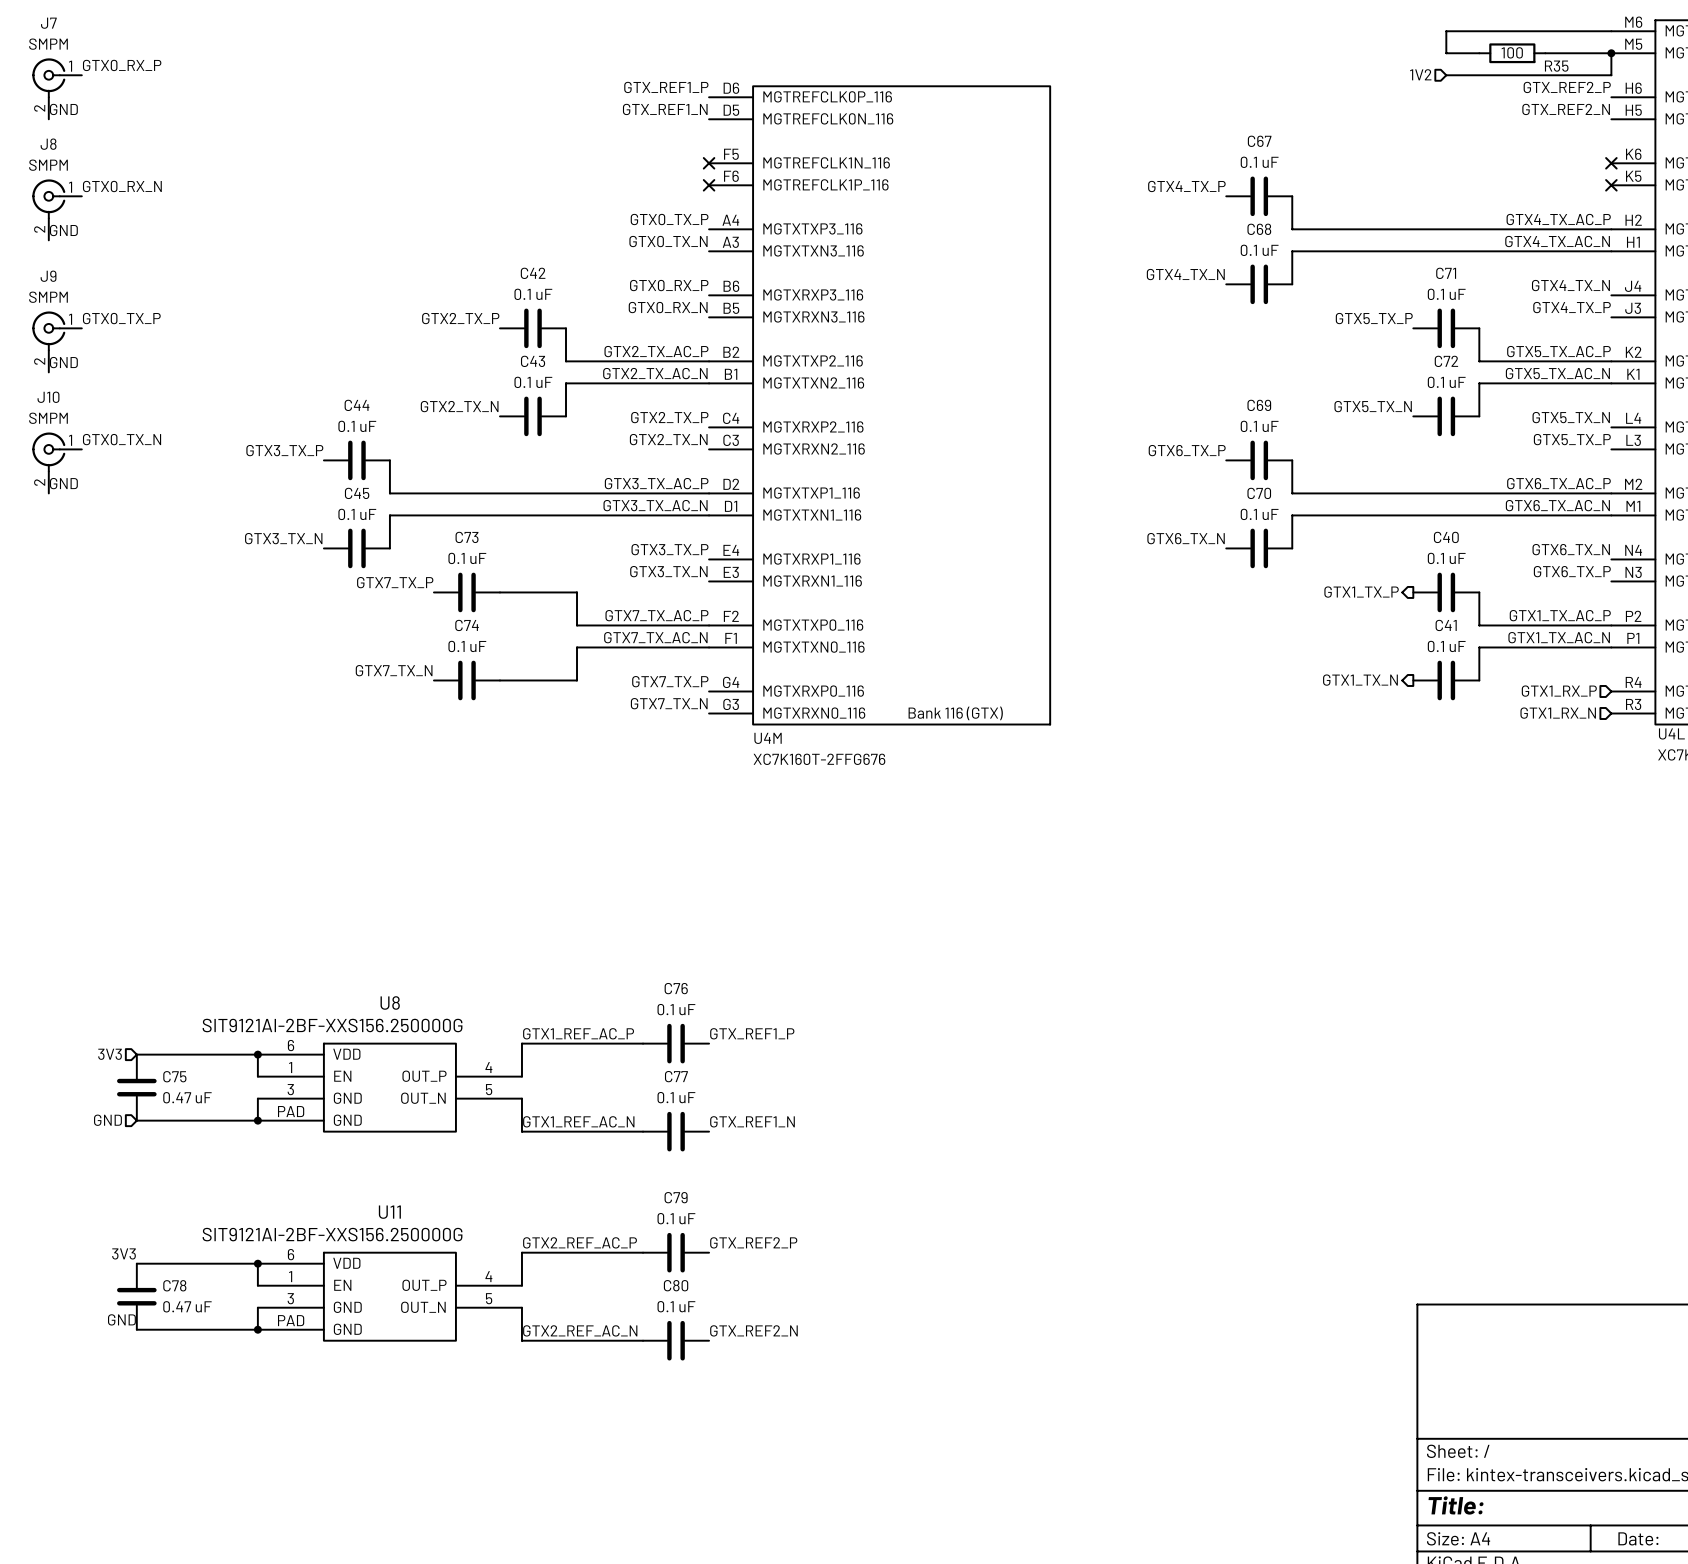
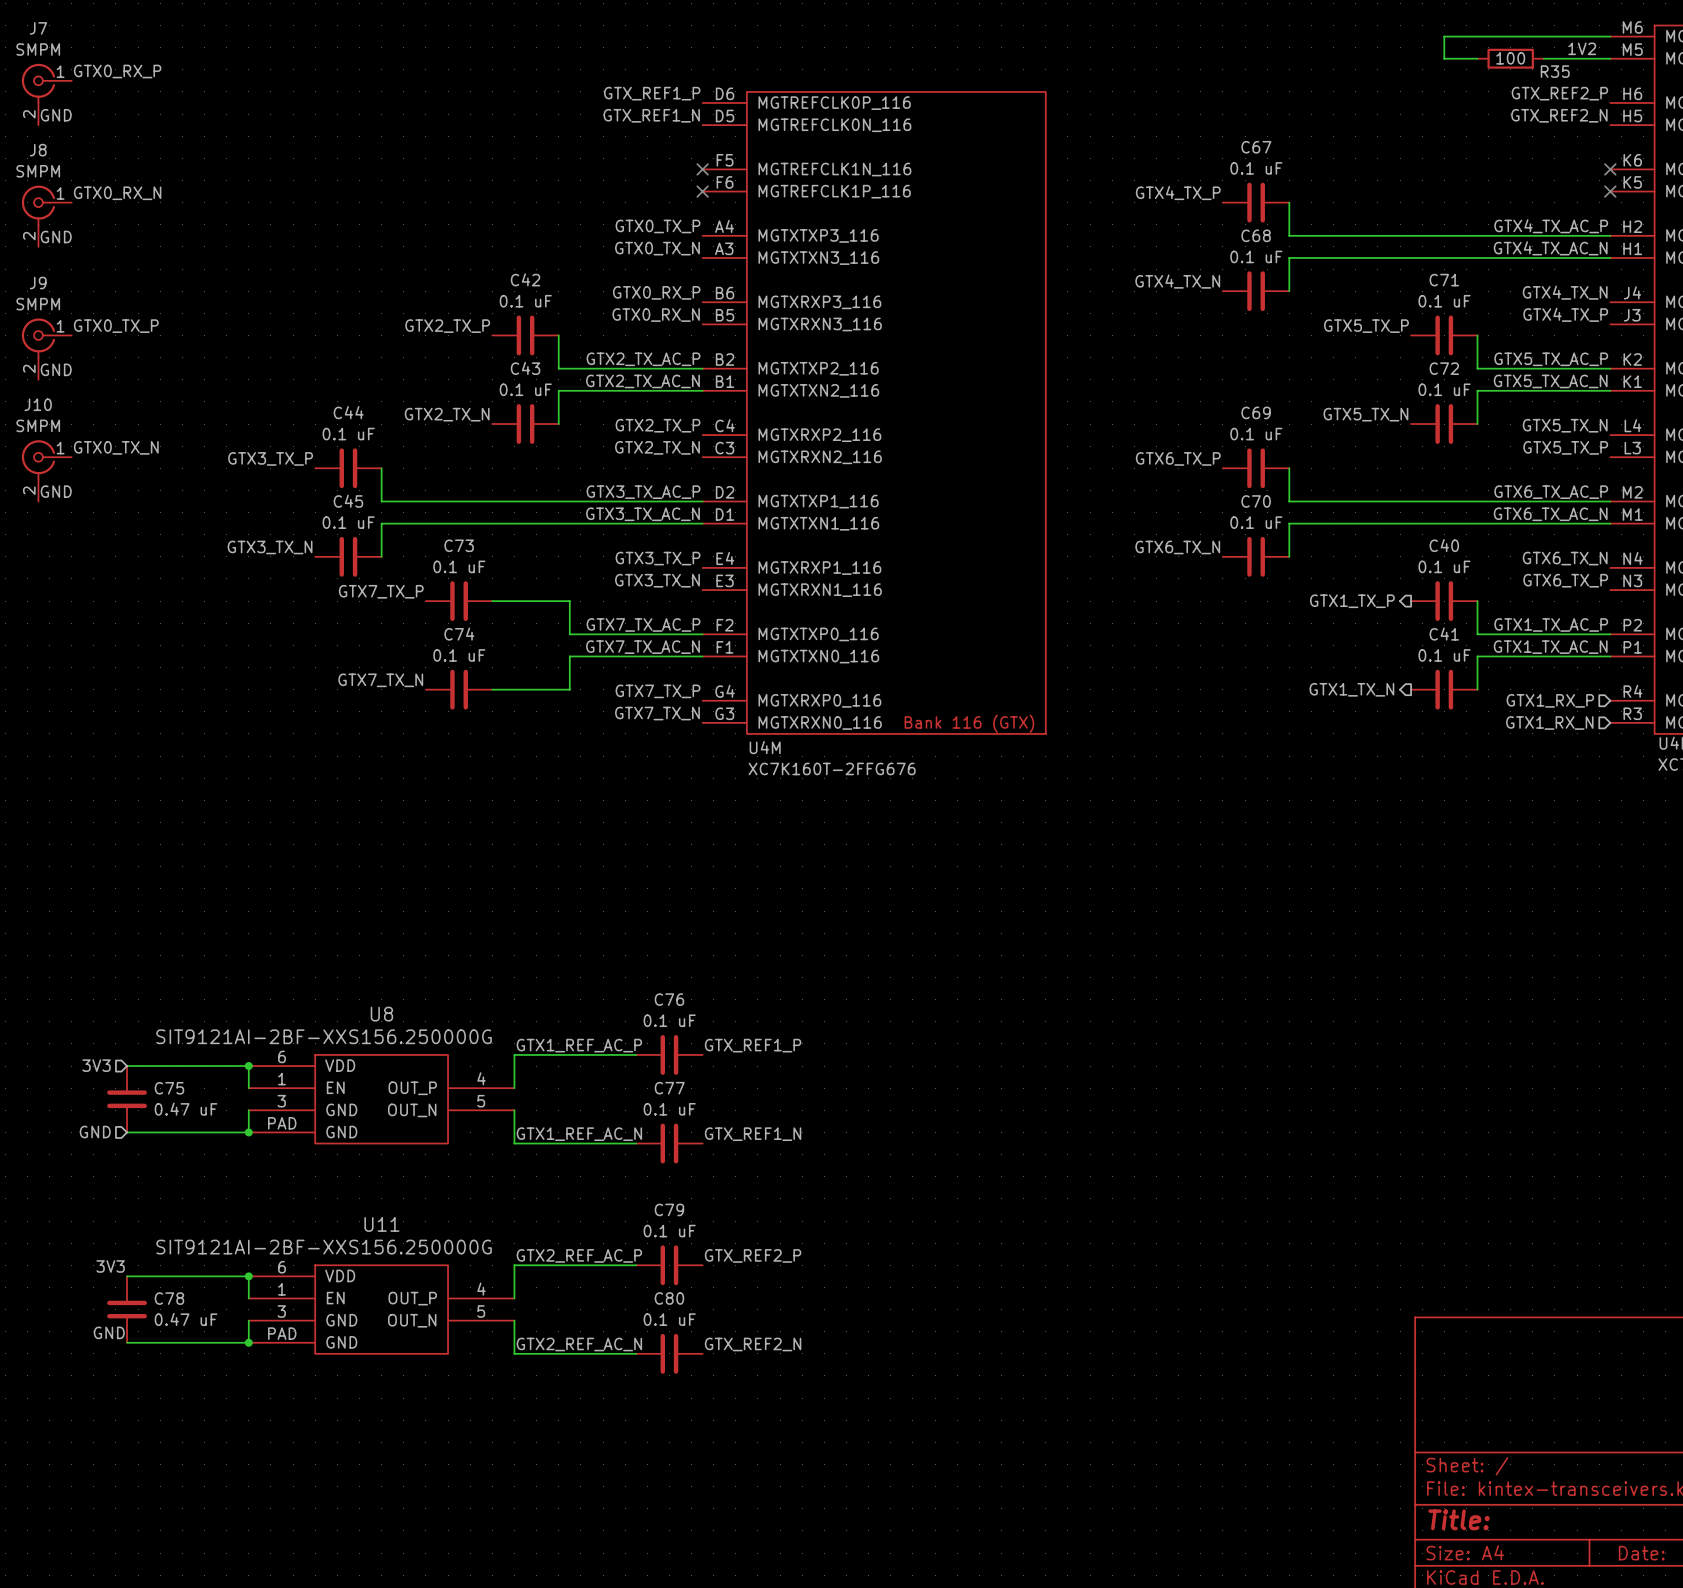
label: none -> 1V2 (1582, 48)
wire: (1611, 53) (1611, 75) (1446, 75) -> none
junction: (1611, 53) -> none
hierarchical label: 1V2 (1420, 74) -> none

